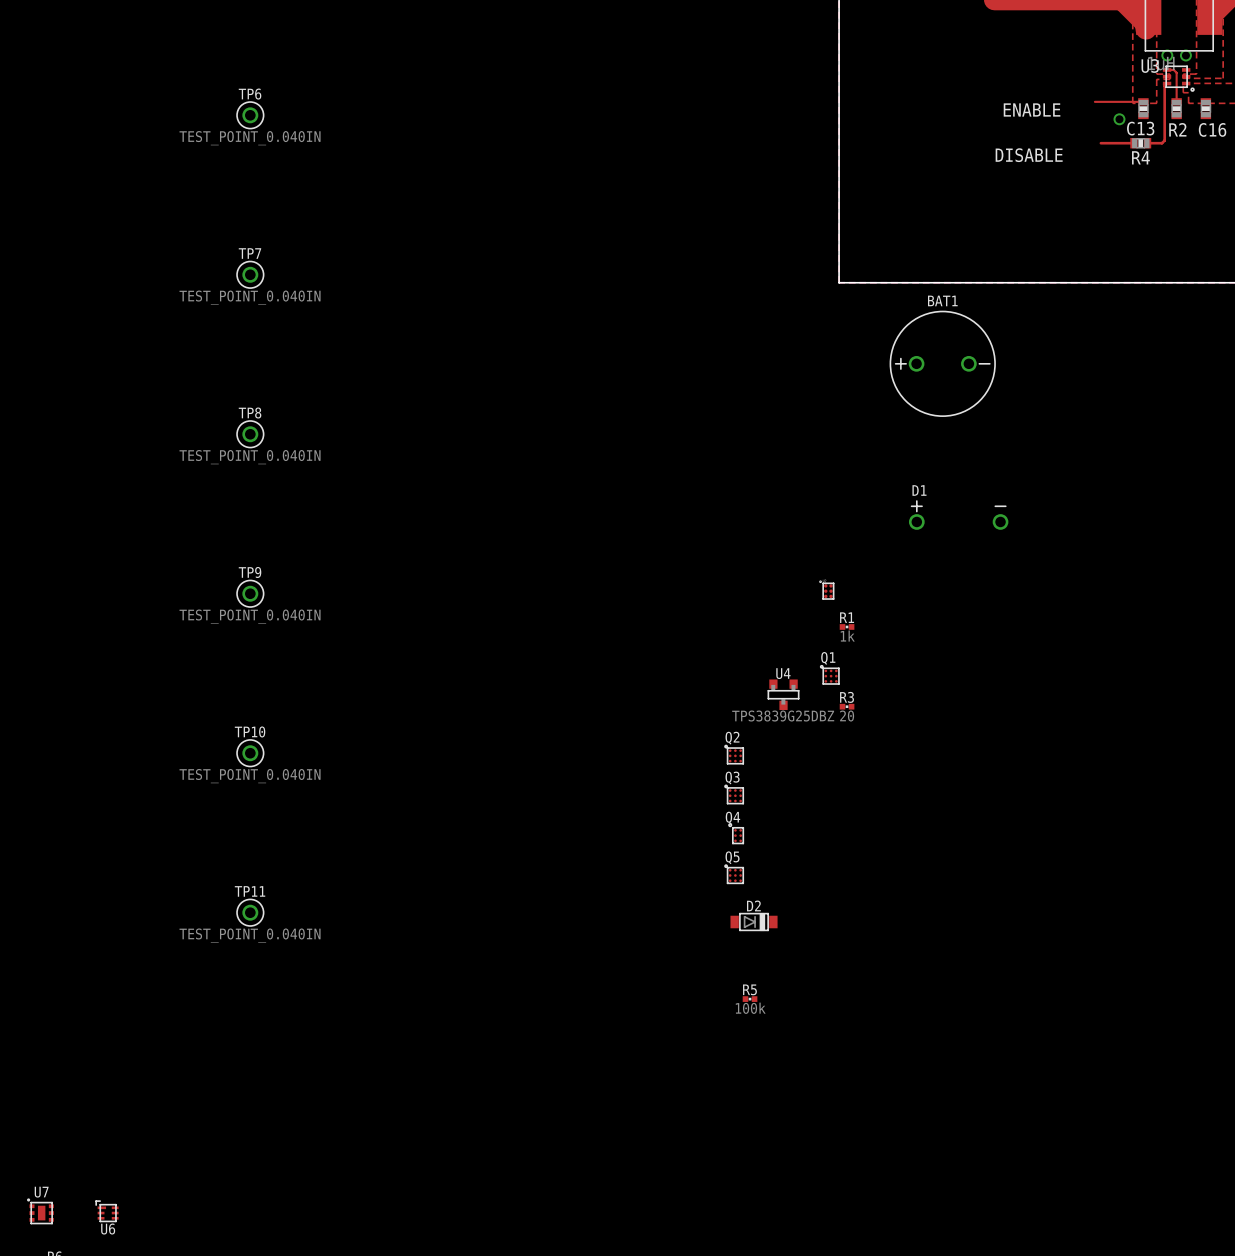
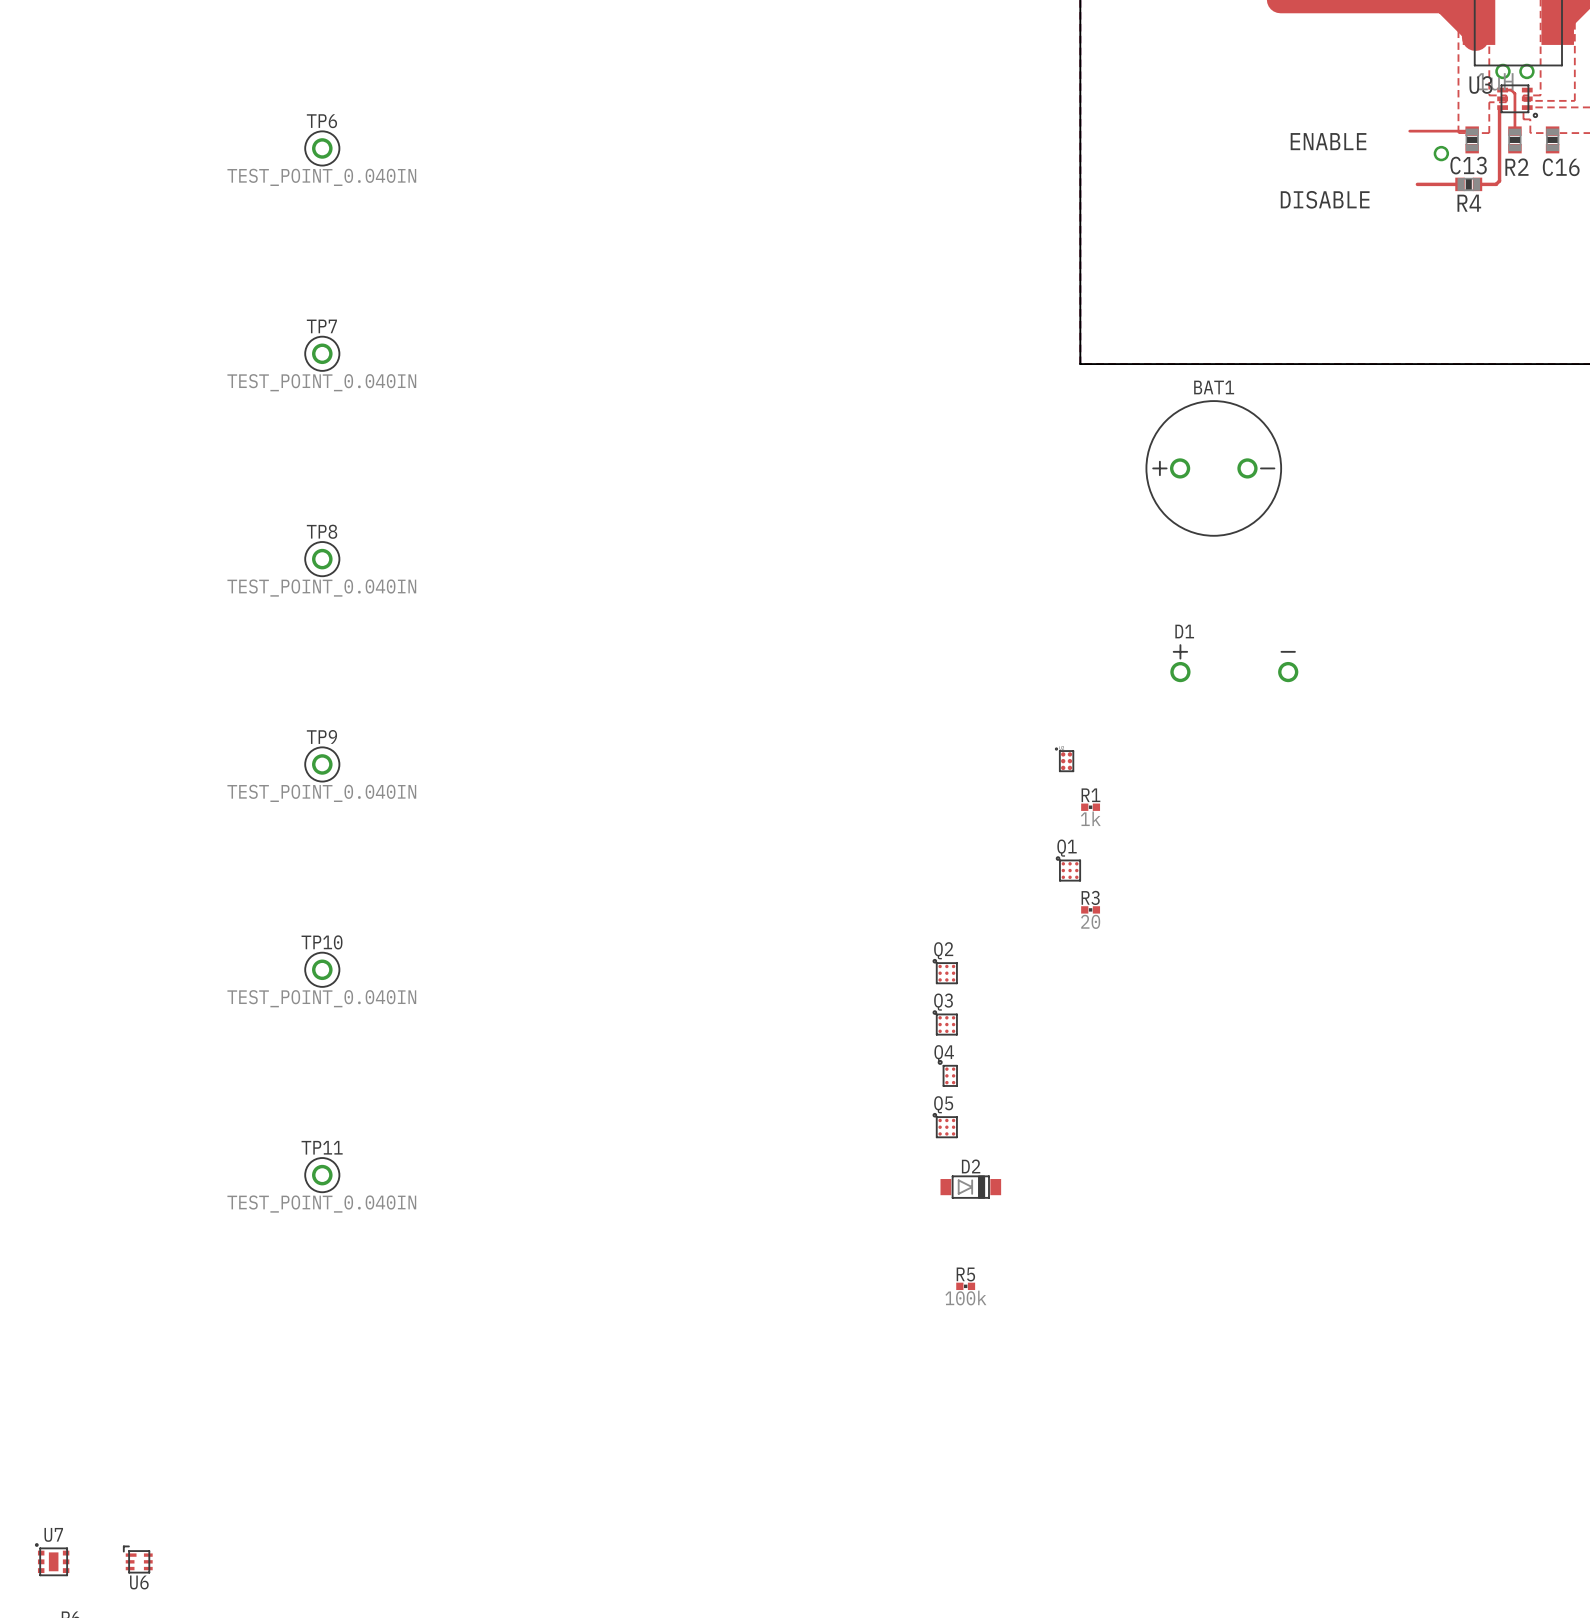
U4: TPS3839G25DBZ (783, 694) -> none

